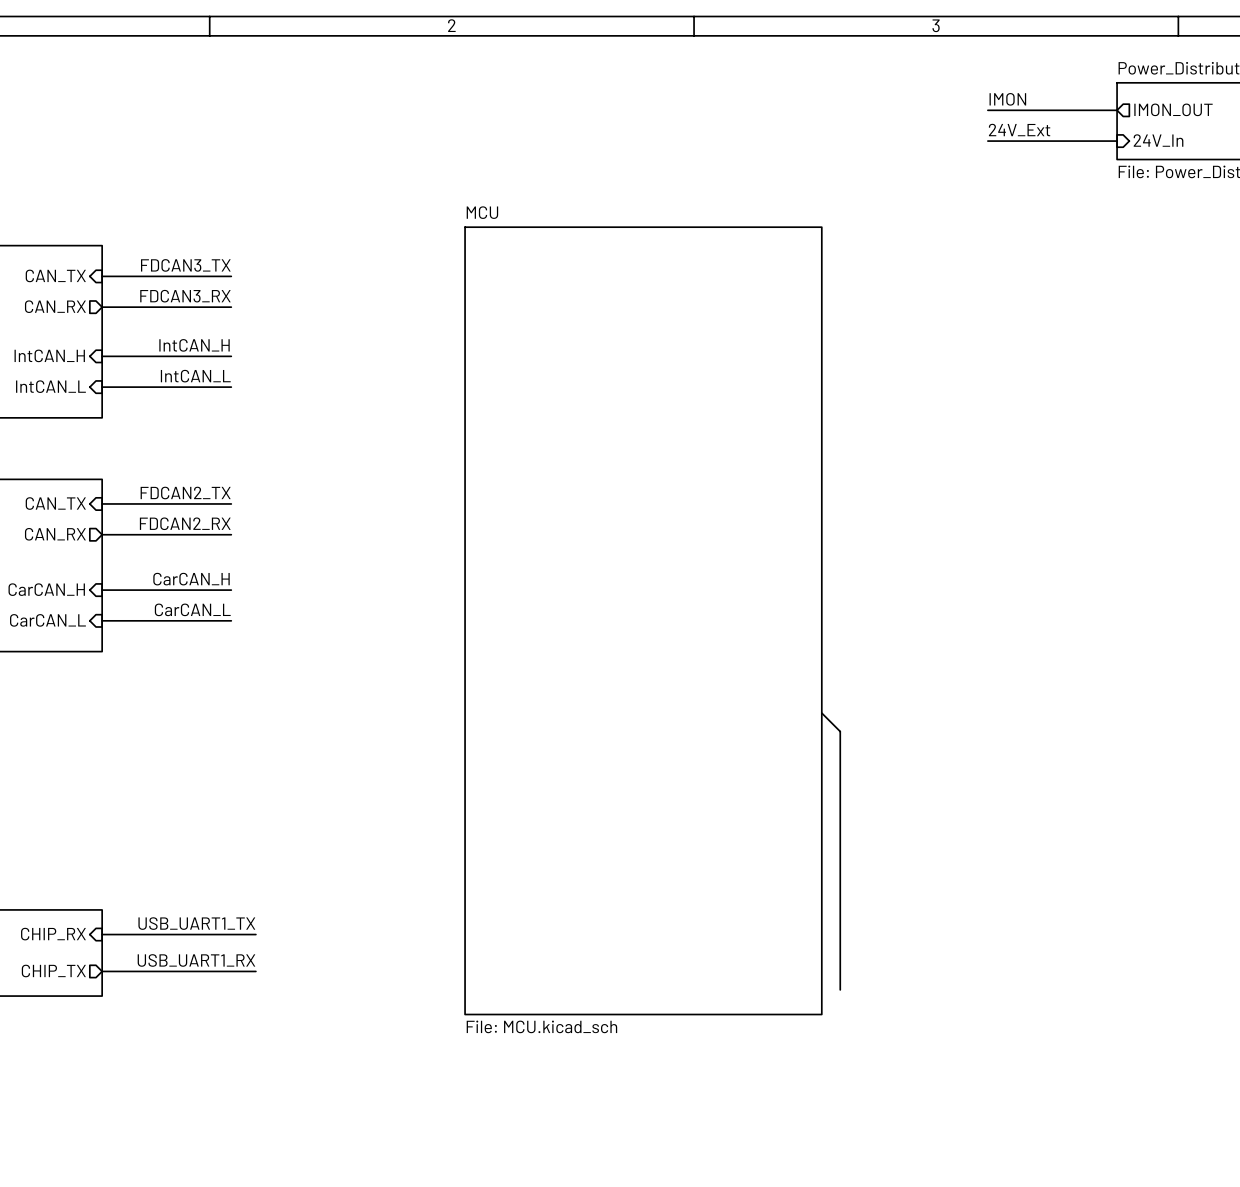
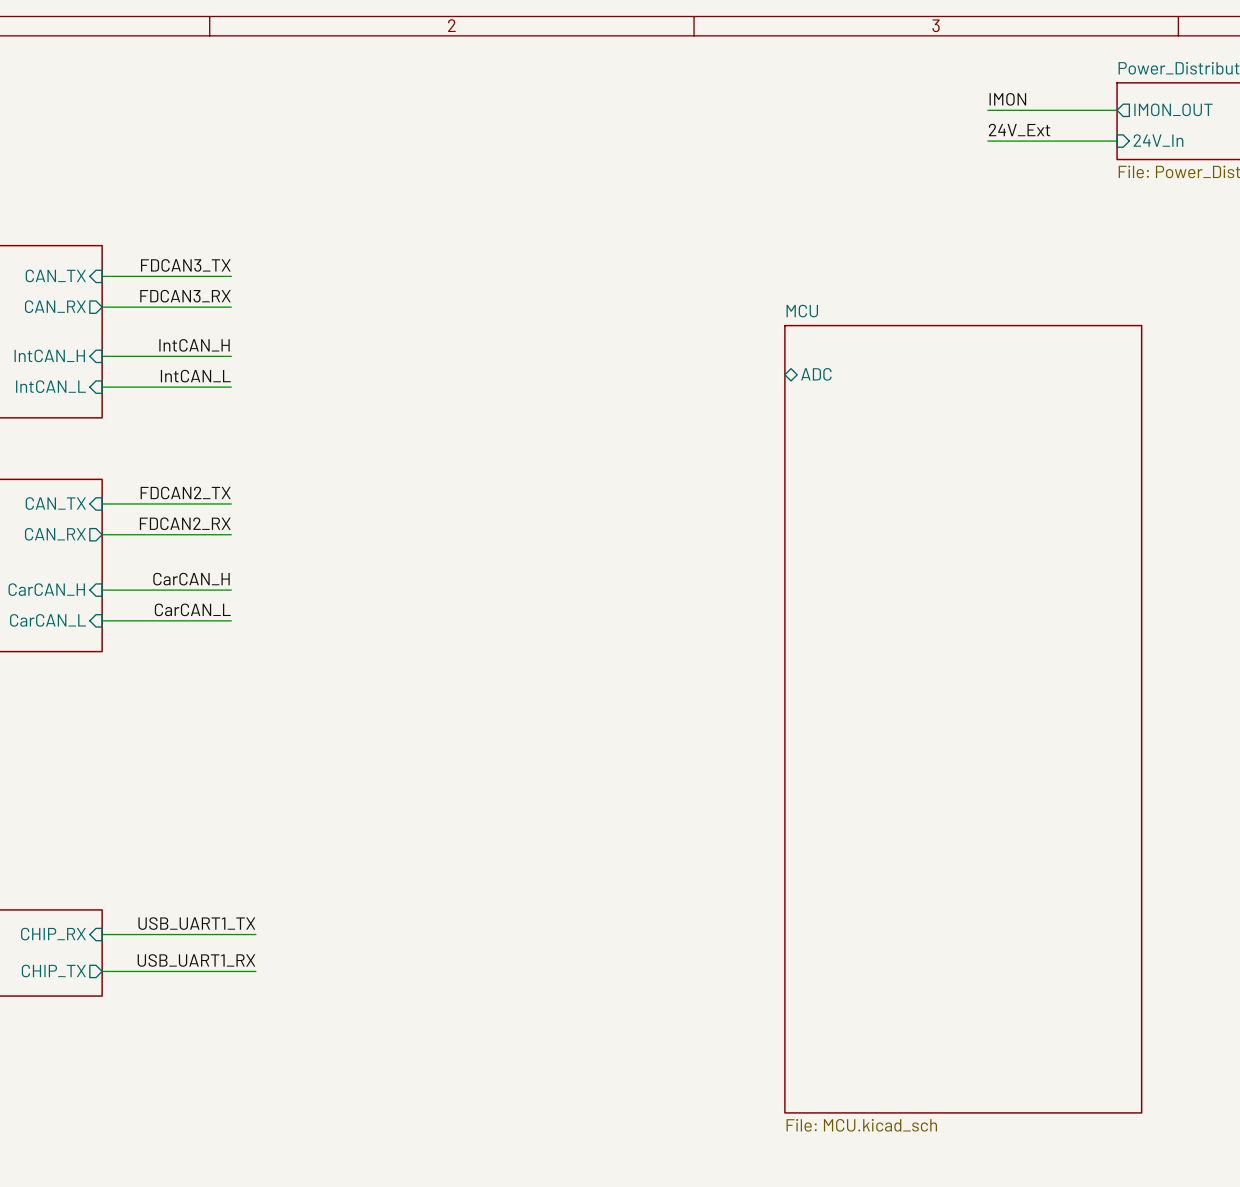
sheet pin: none -> ADC (816, 374)
sheet MCU: File: MCU.kicad_sch (643, 620) -> none
bus: (821, 713) (840, 731) (840, 989) -> none
sheet MCU: none -> File: MCU.kicad_sch (963, 719)

